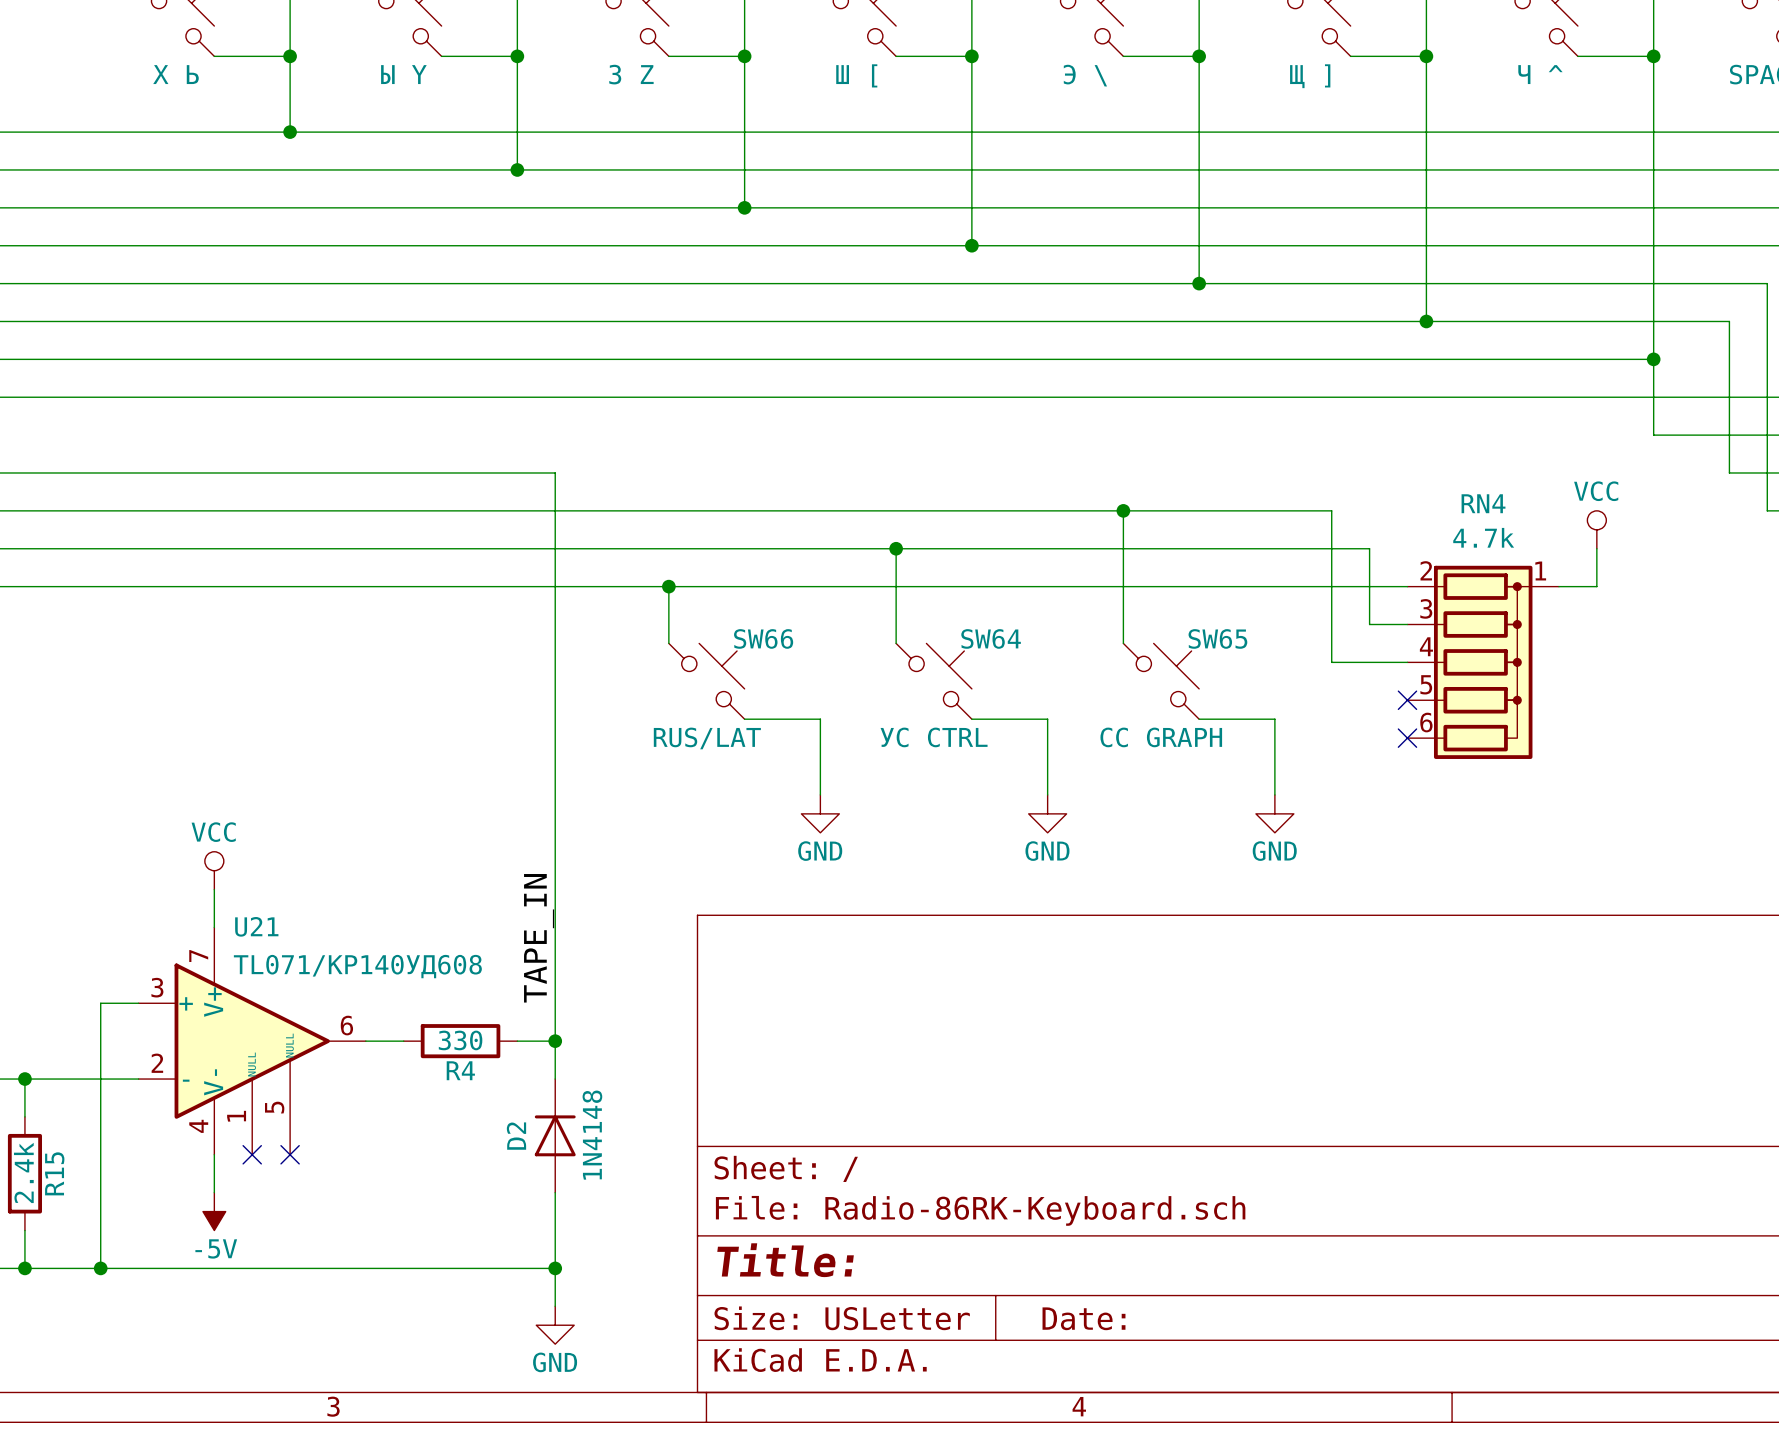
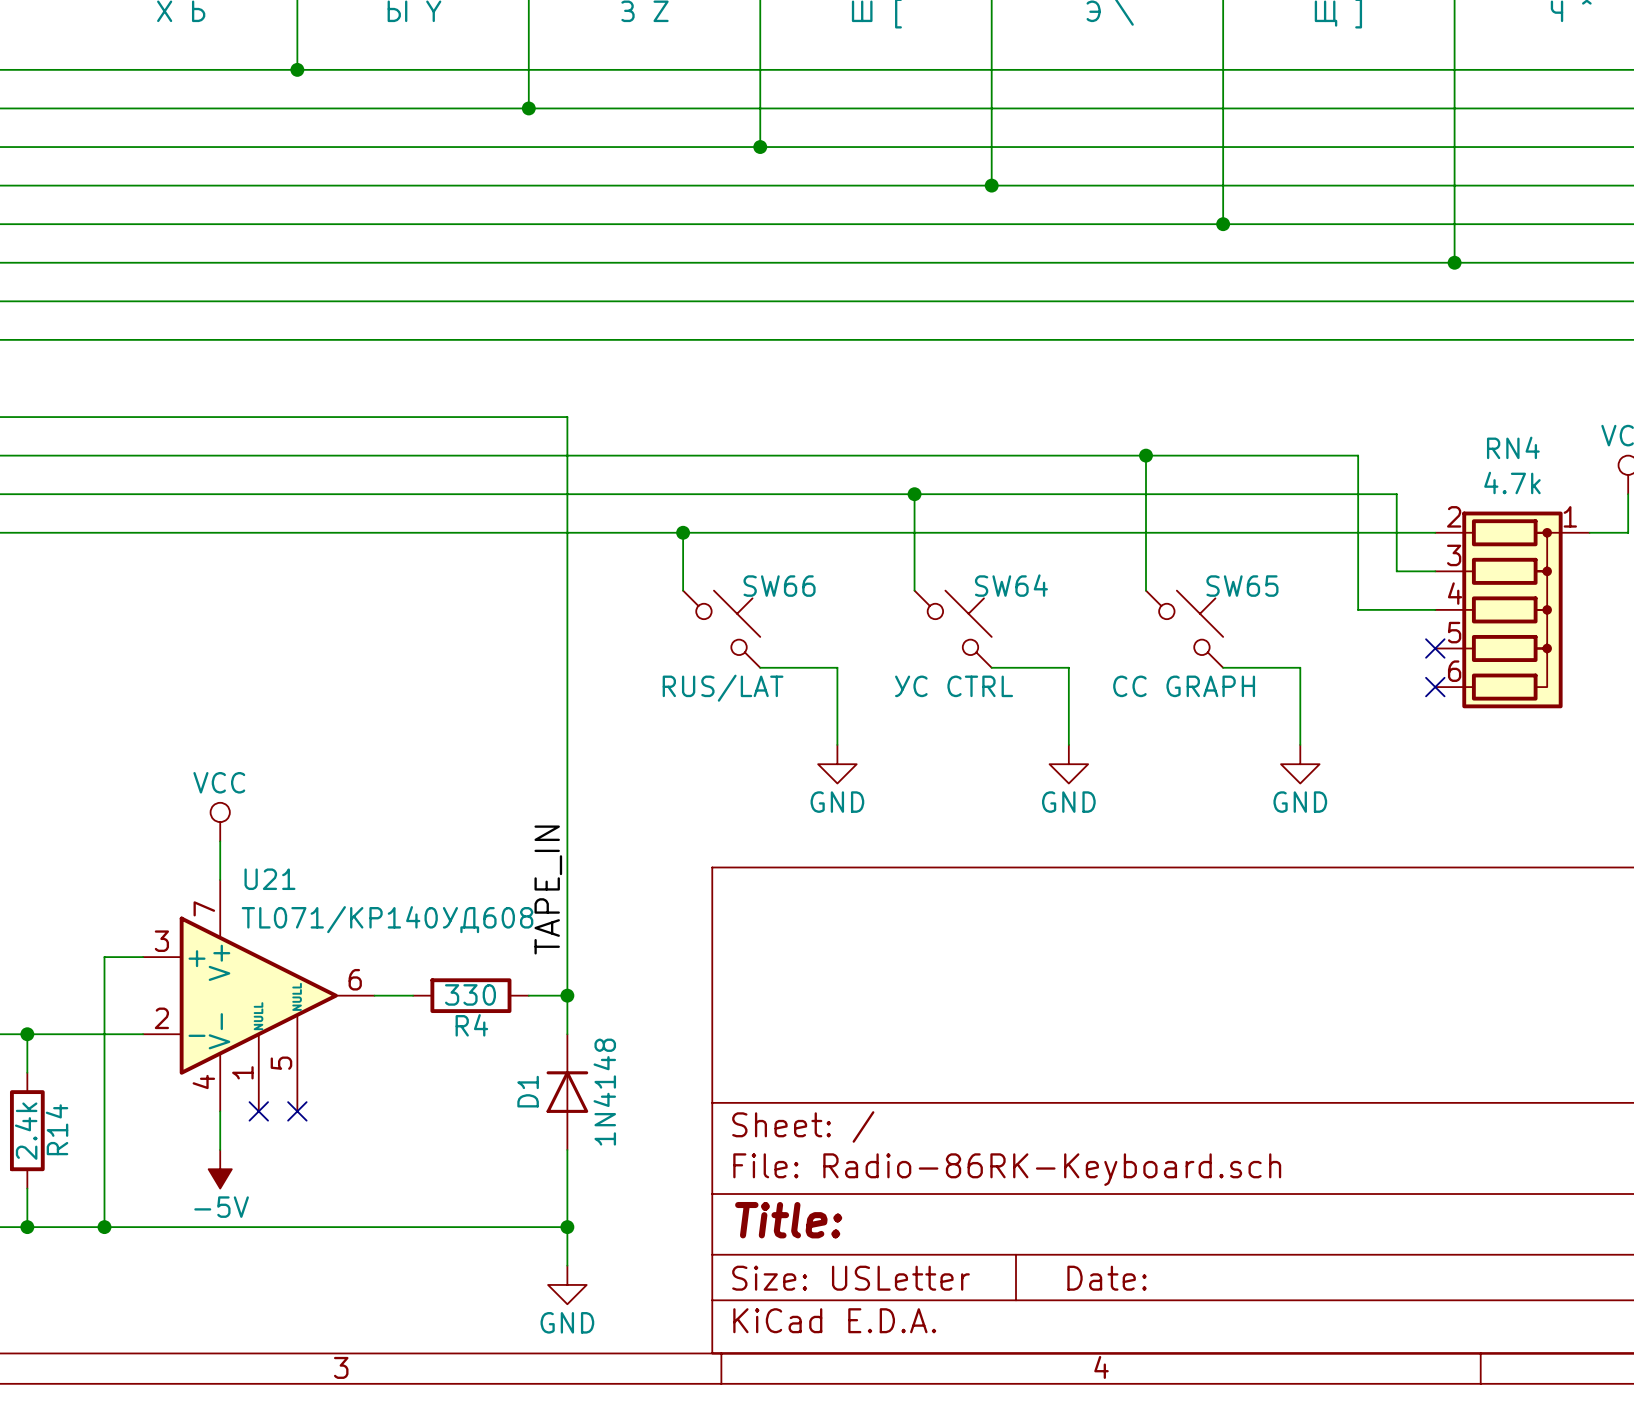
D2 name: D2 (516, 1136) -> D1 (528, 1091)
R15 name: R15 (54, 1173) -> R14 (57, 1129)

